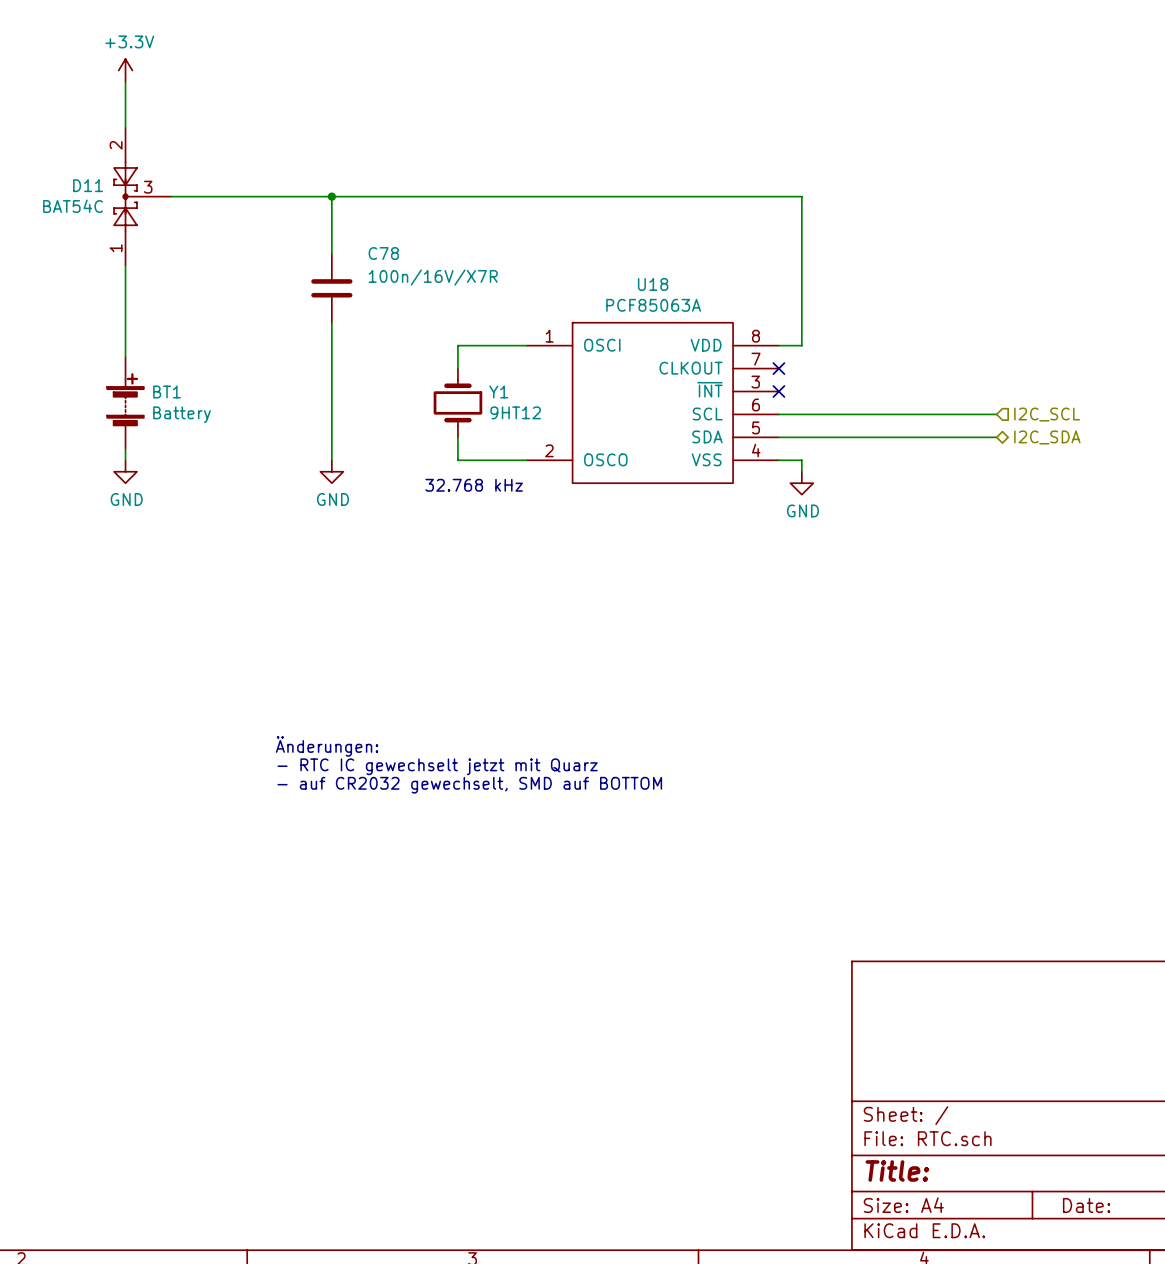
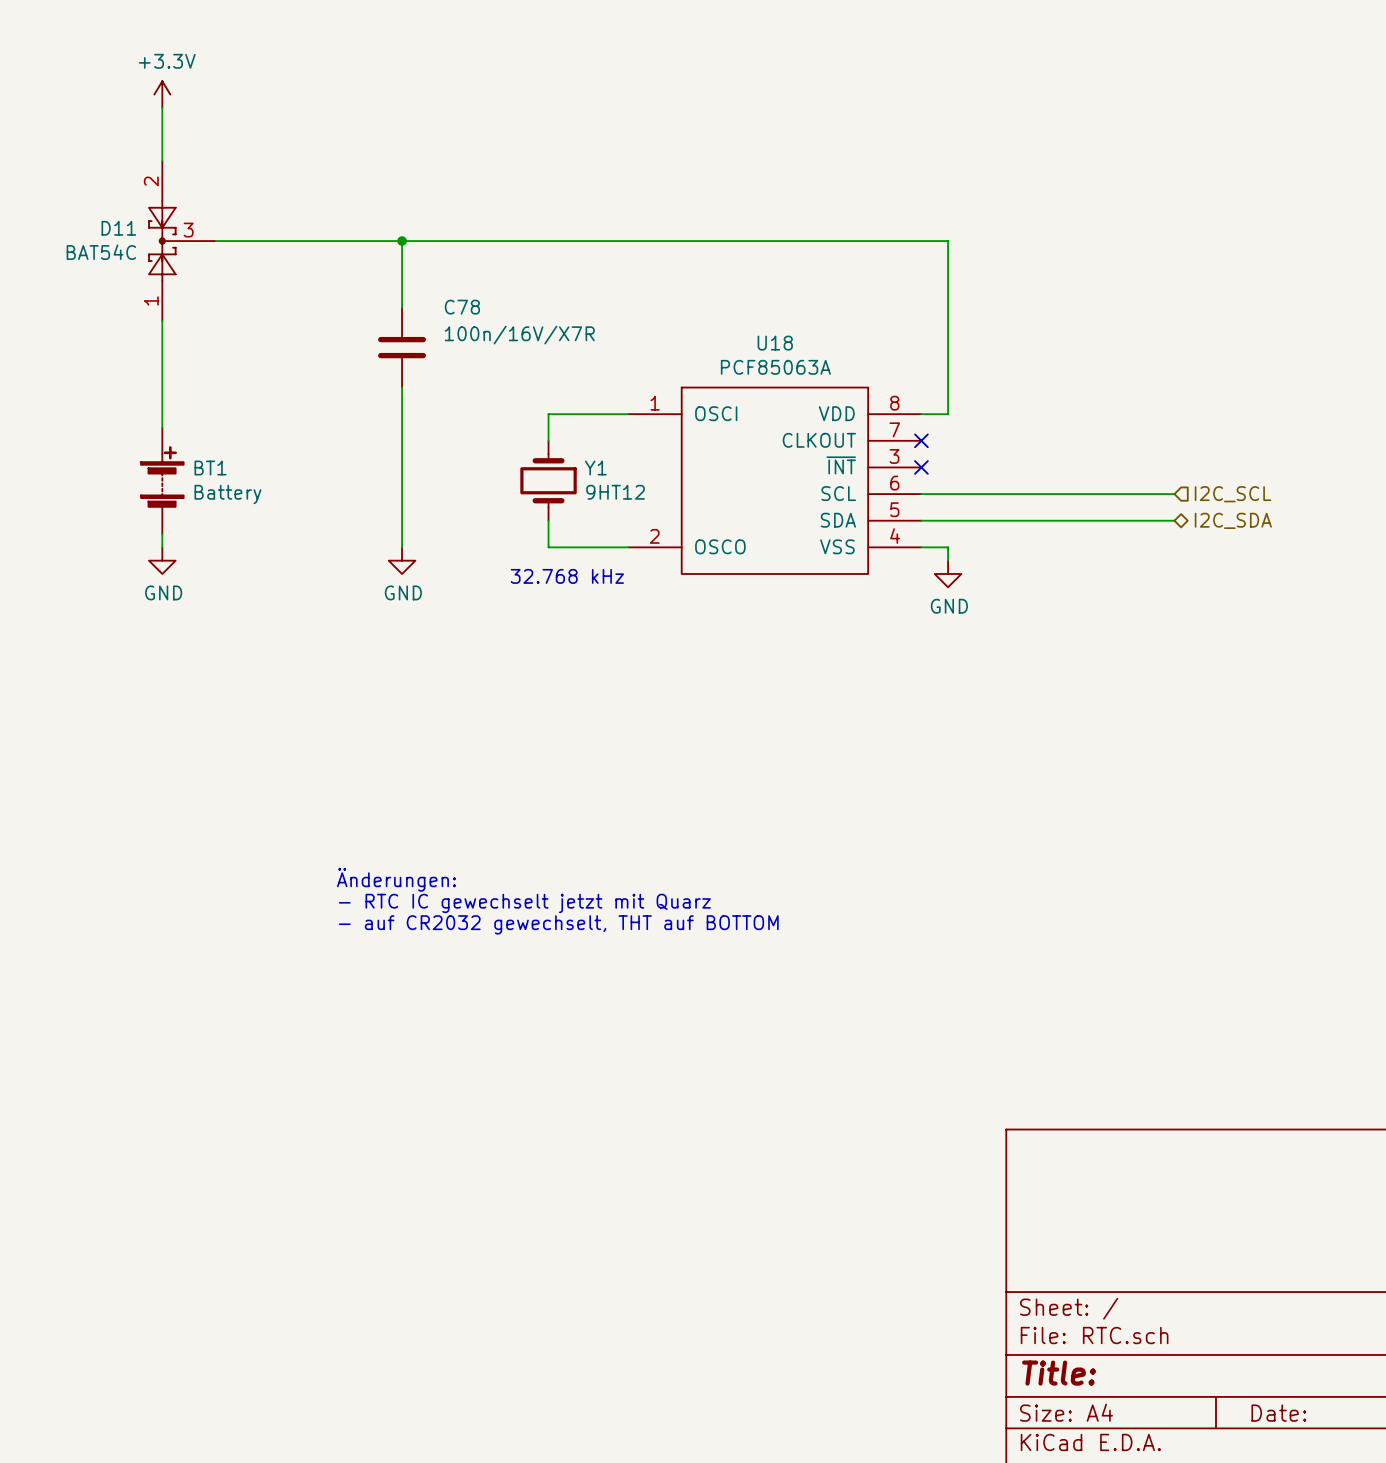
text: - auf CR2032 gewechselt, SMD auf BOTTOM (469, 785) -> - auf CR2032 gewechselt, THT auf BOTTOM (558, 924)

